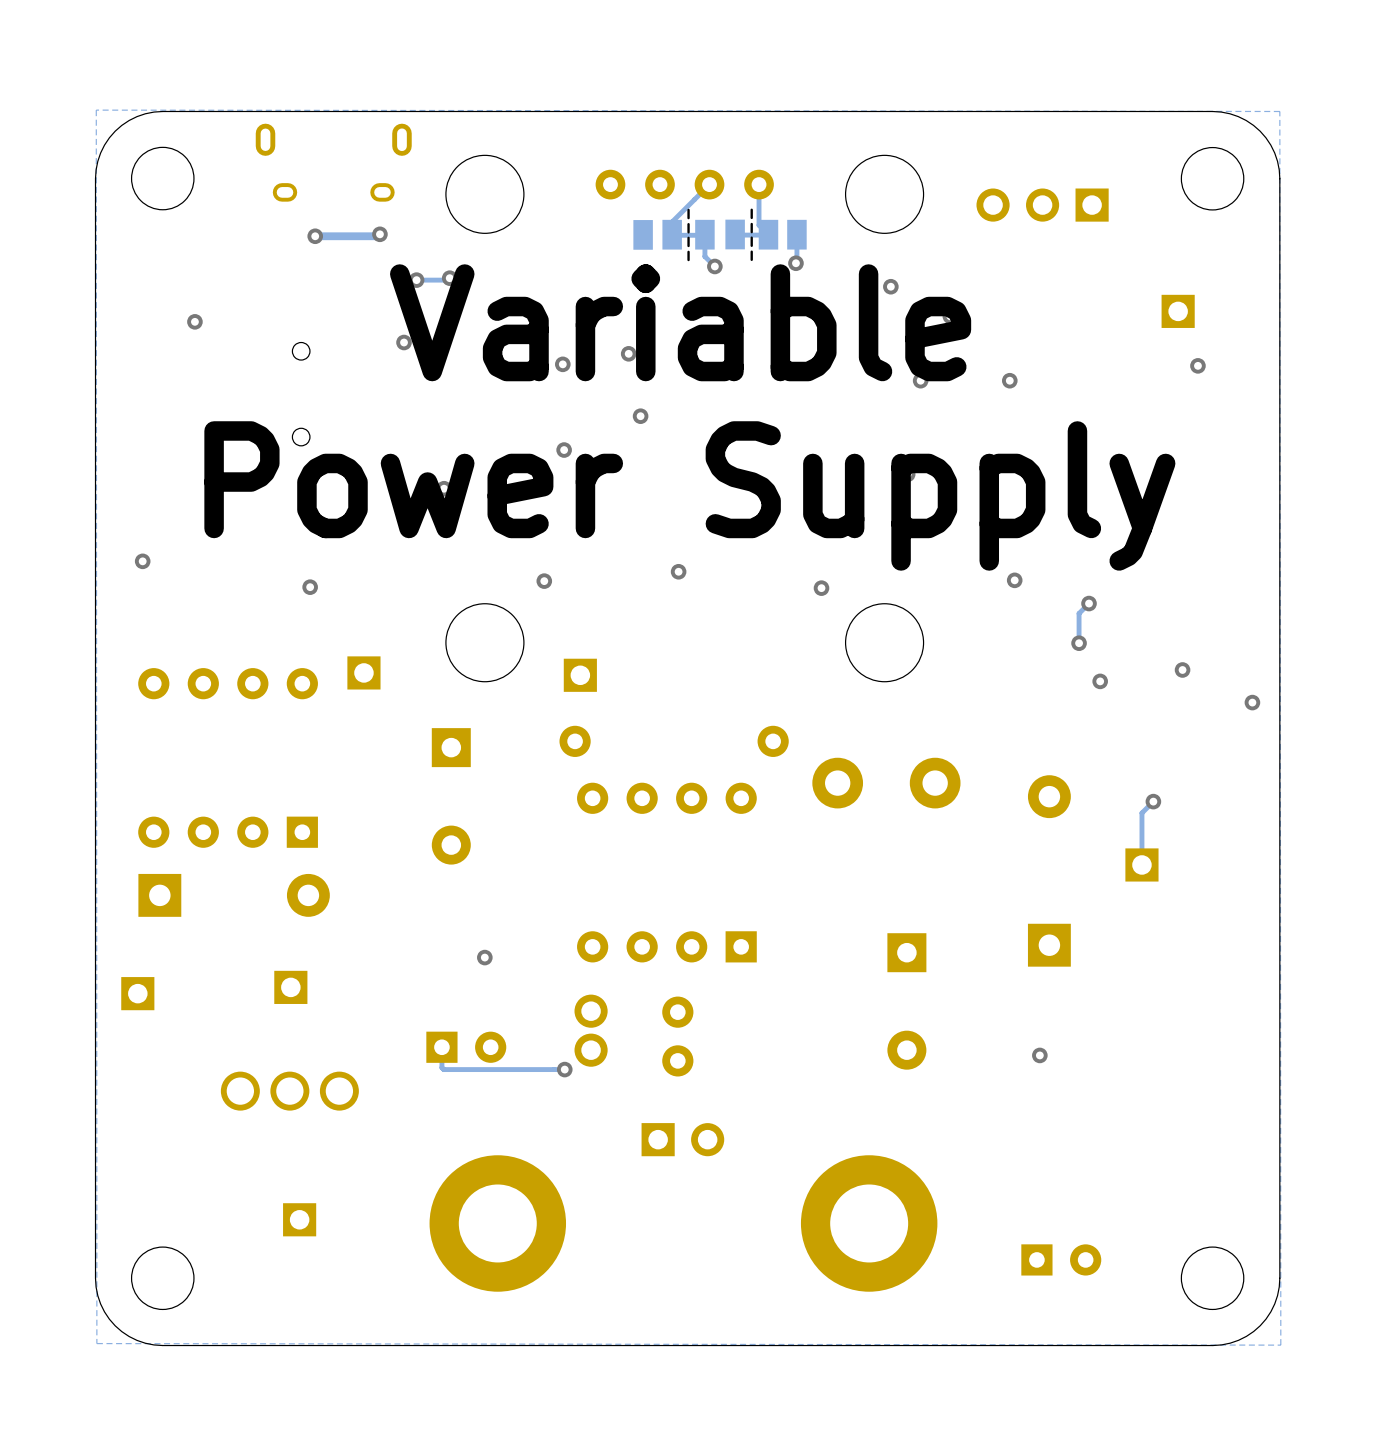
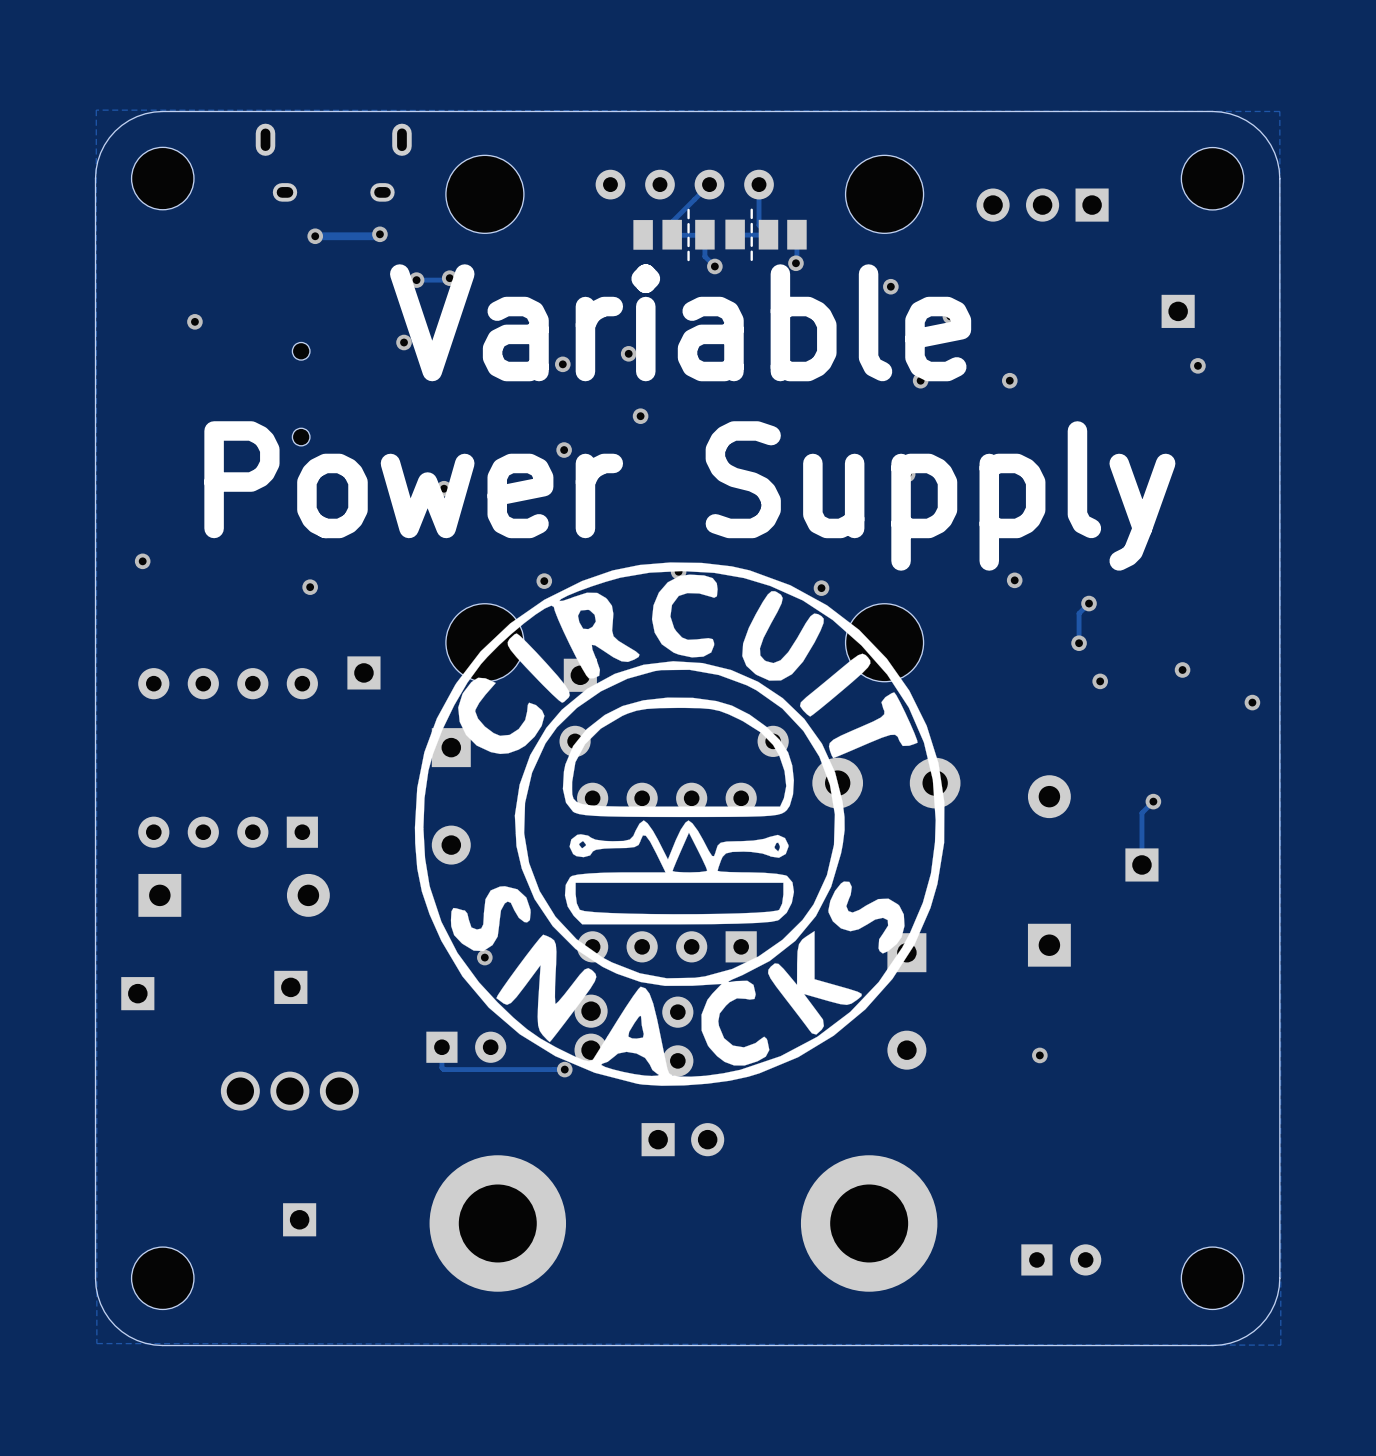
drawing: none -> [414, 562, 945, 1086]

